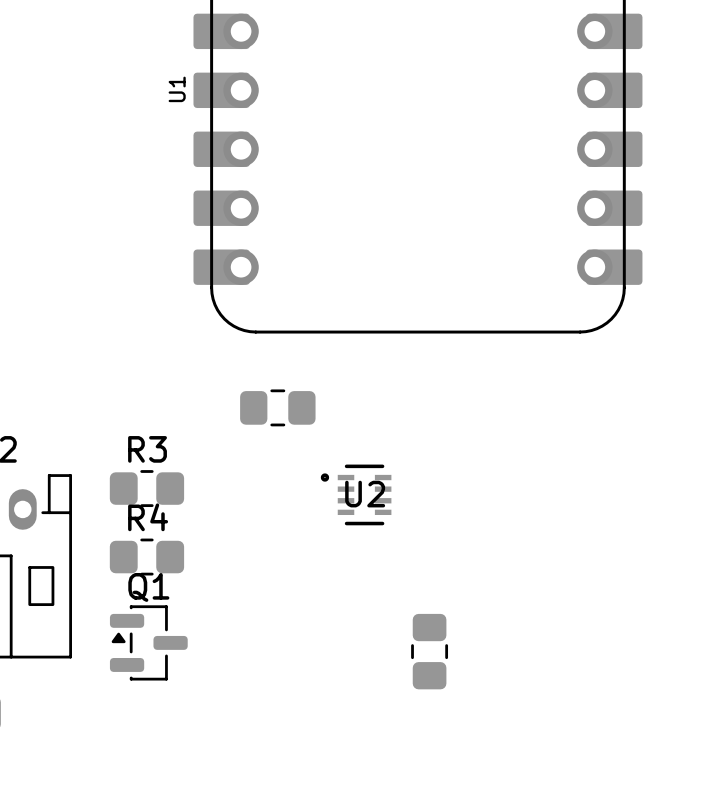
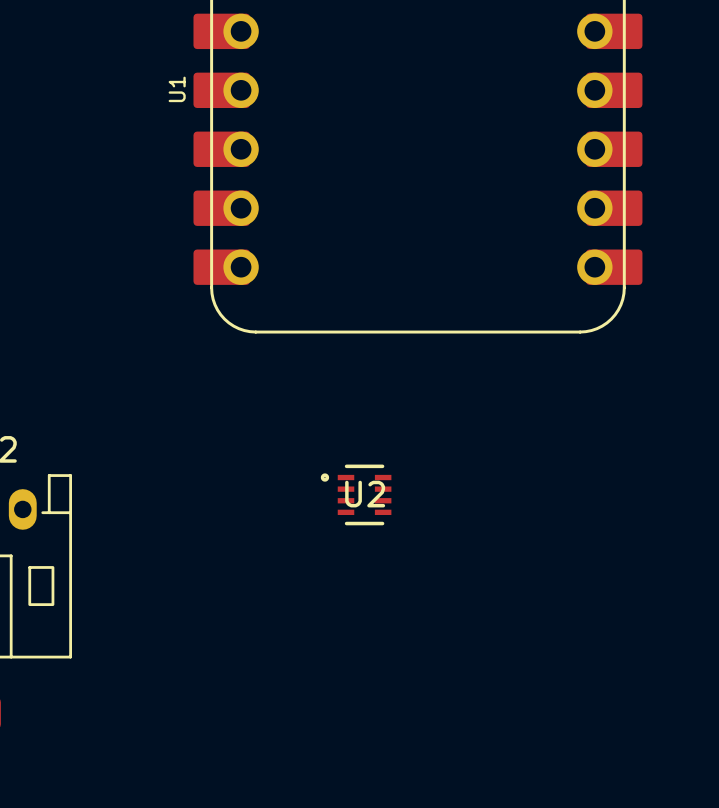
part: (277, 407) -> none
R3: (146, 488) -> none
R4: (146, 557) -> none
Q1: (148, 642) -> none
part: (429, 651) -> none

